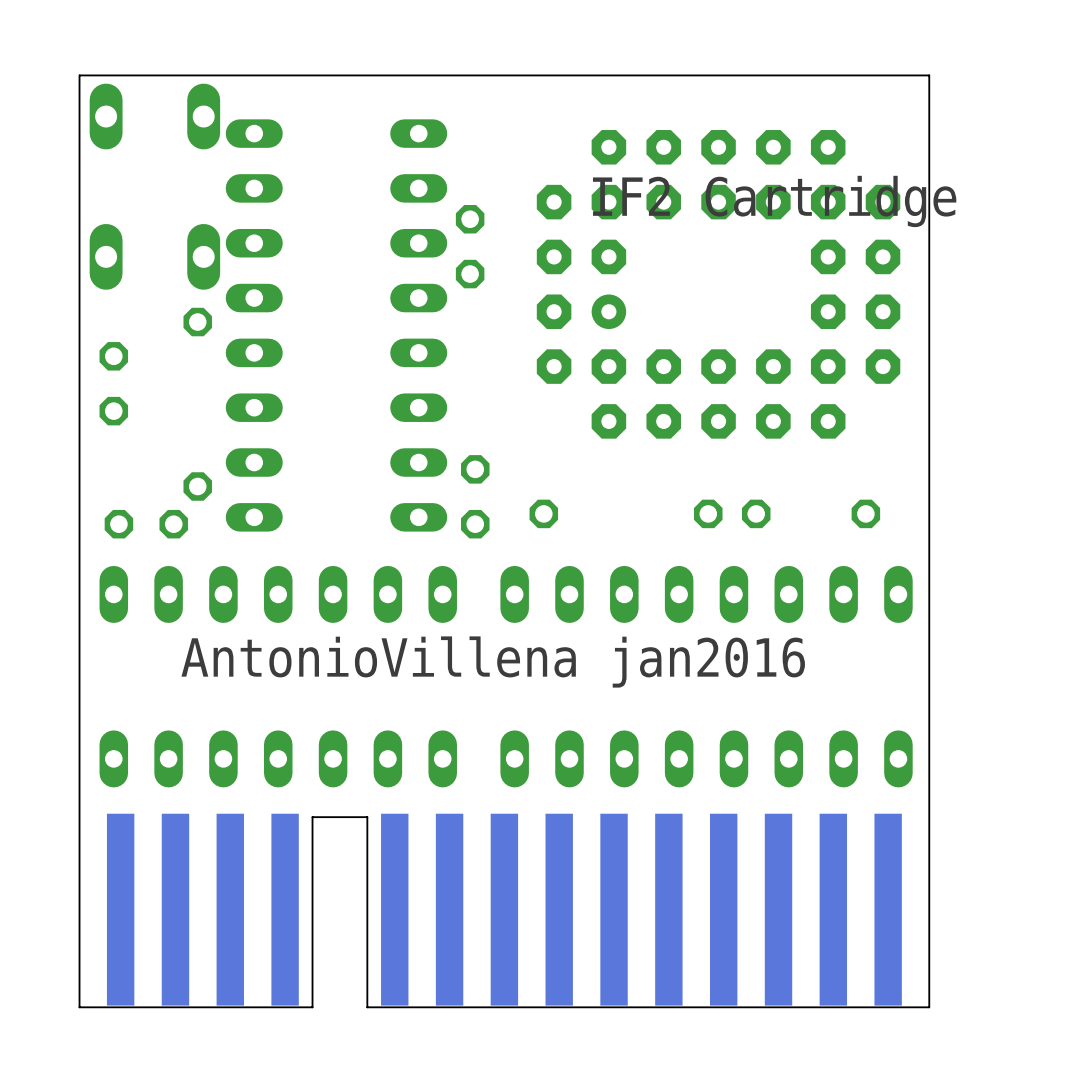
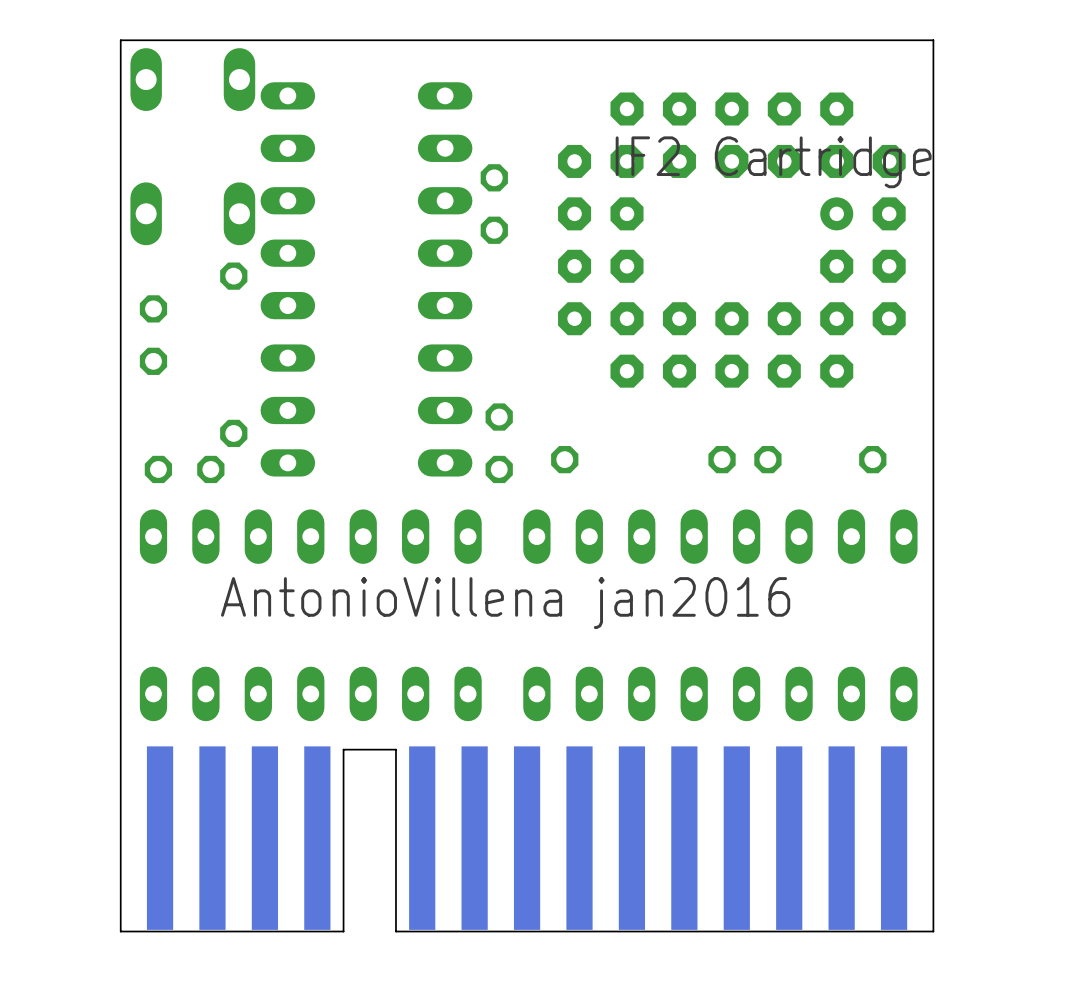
part rotation: 0° (718, 284) -> 180° (731, 240)

